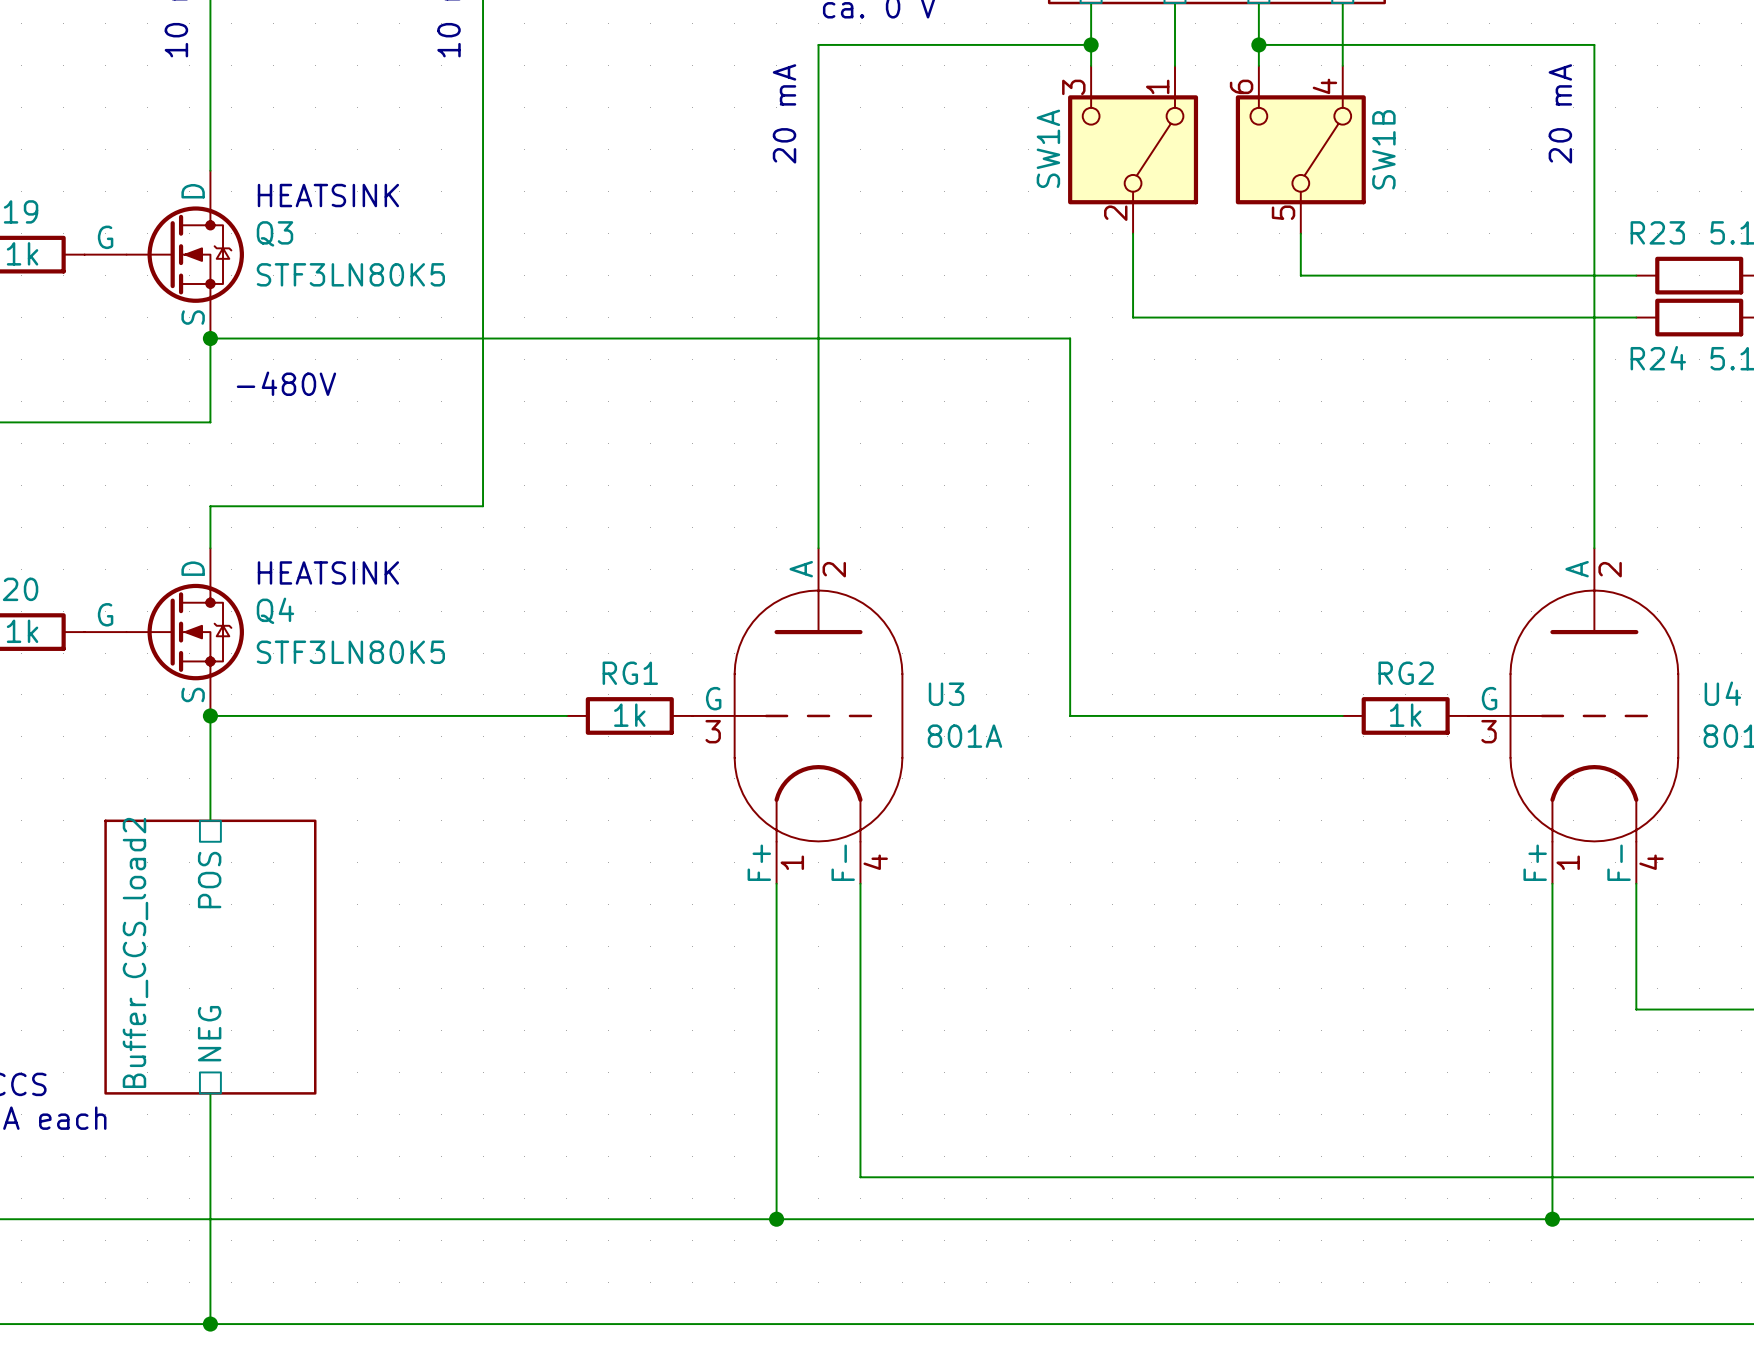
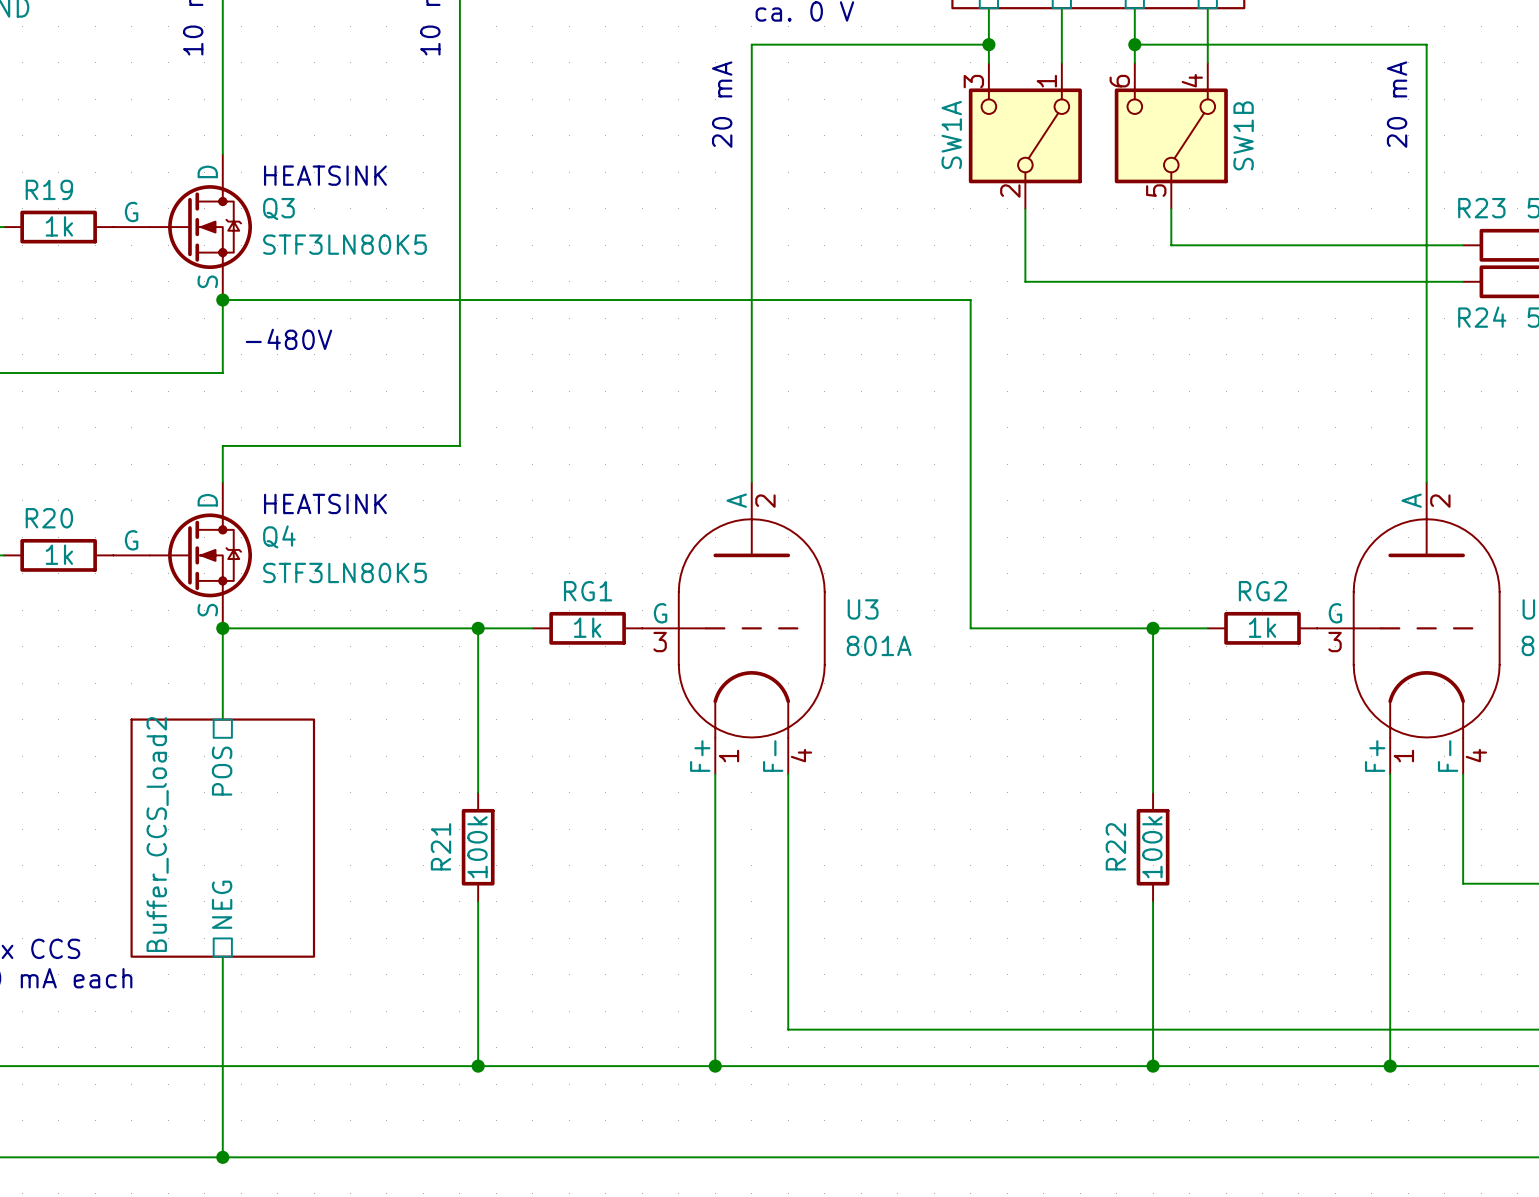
wire: none -> (478, 628) (478, 792)
junction: none -> (478, 628)
wire: none -> (1153, 628) (1153, 792)
junction: none -> (1153, 628)
R21: none -> 100k (478, 847)
R22: none -> 100k (1153, 847)
wire: none -> (478, 901) (478, 1066)
wire: none -> (1153, 901) (1153, 1066)
junction: none -> (478, 1066)
junction: none -> (1153, 1066)

